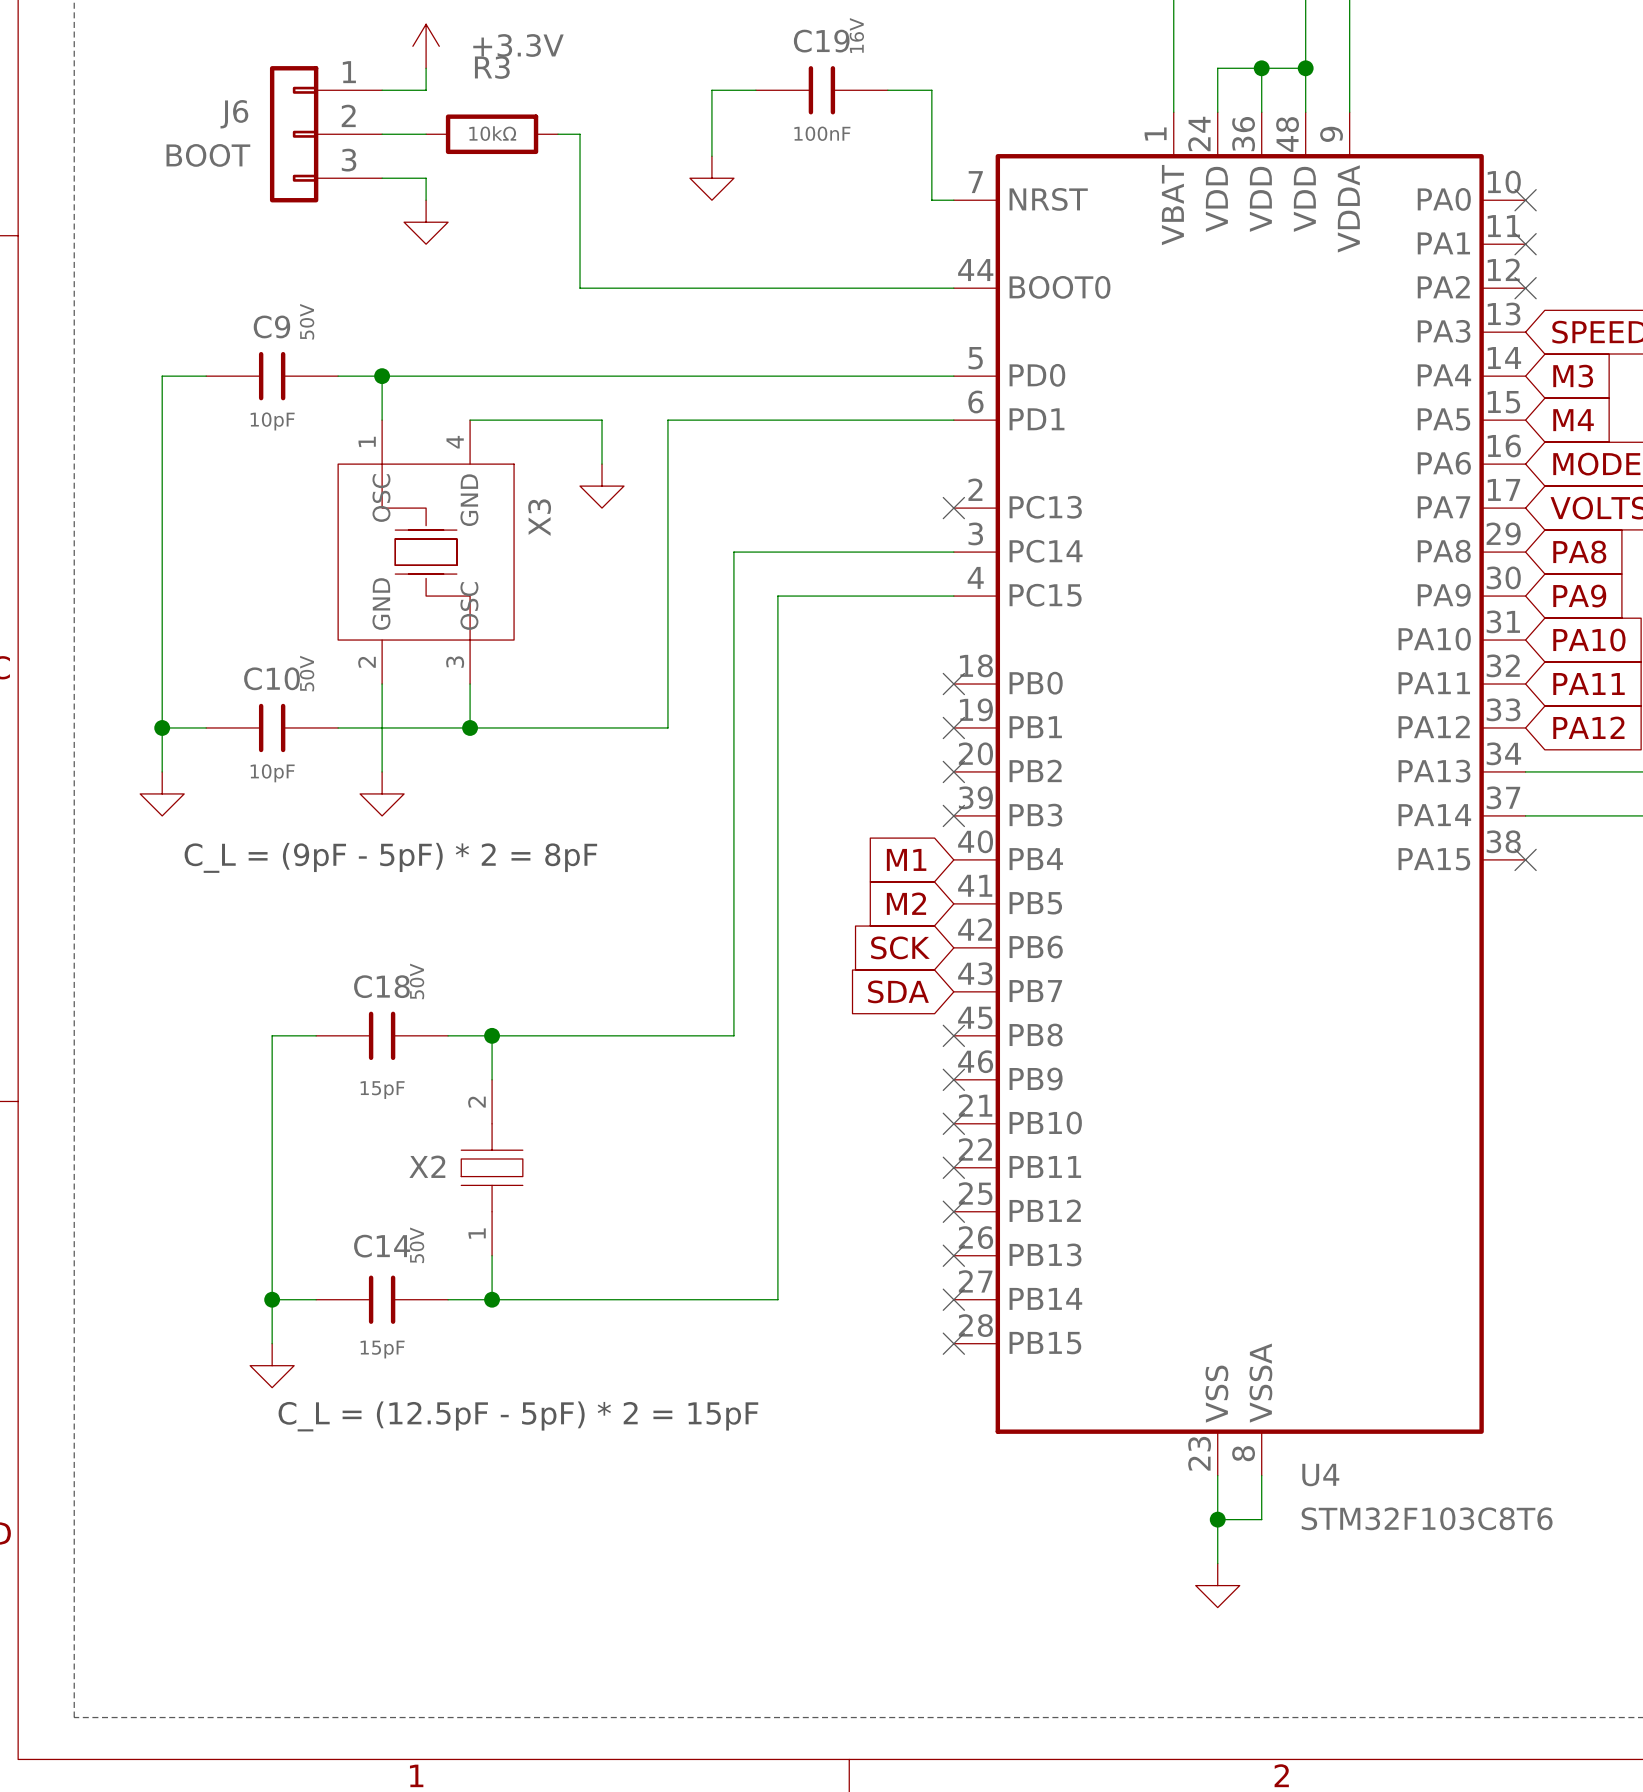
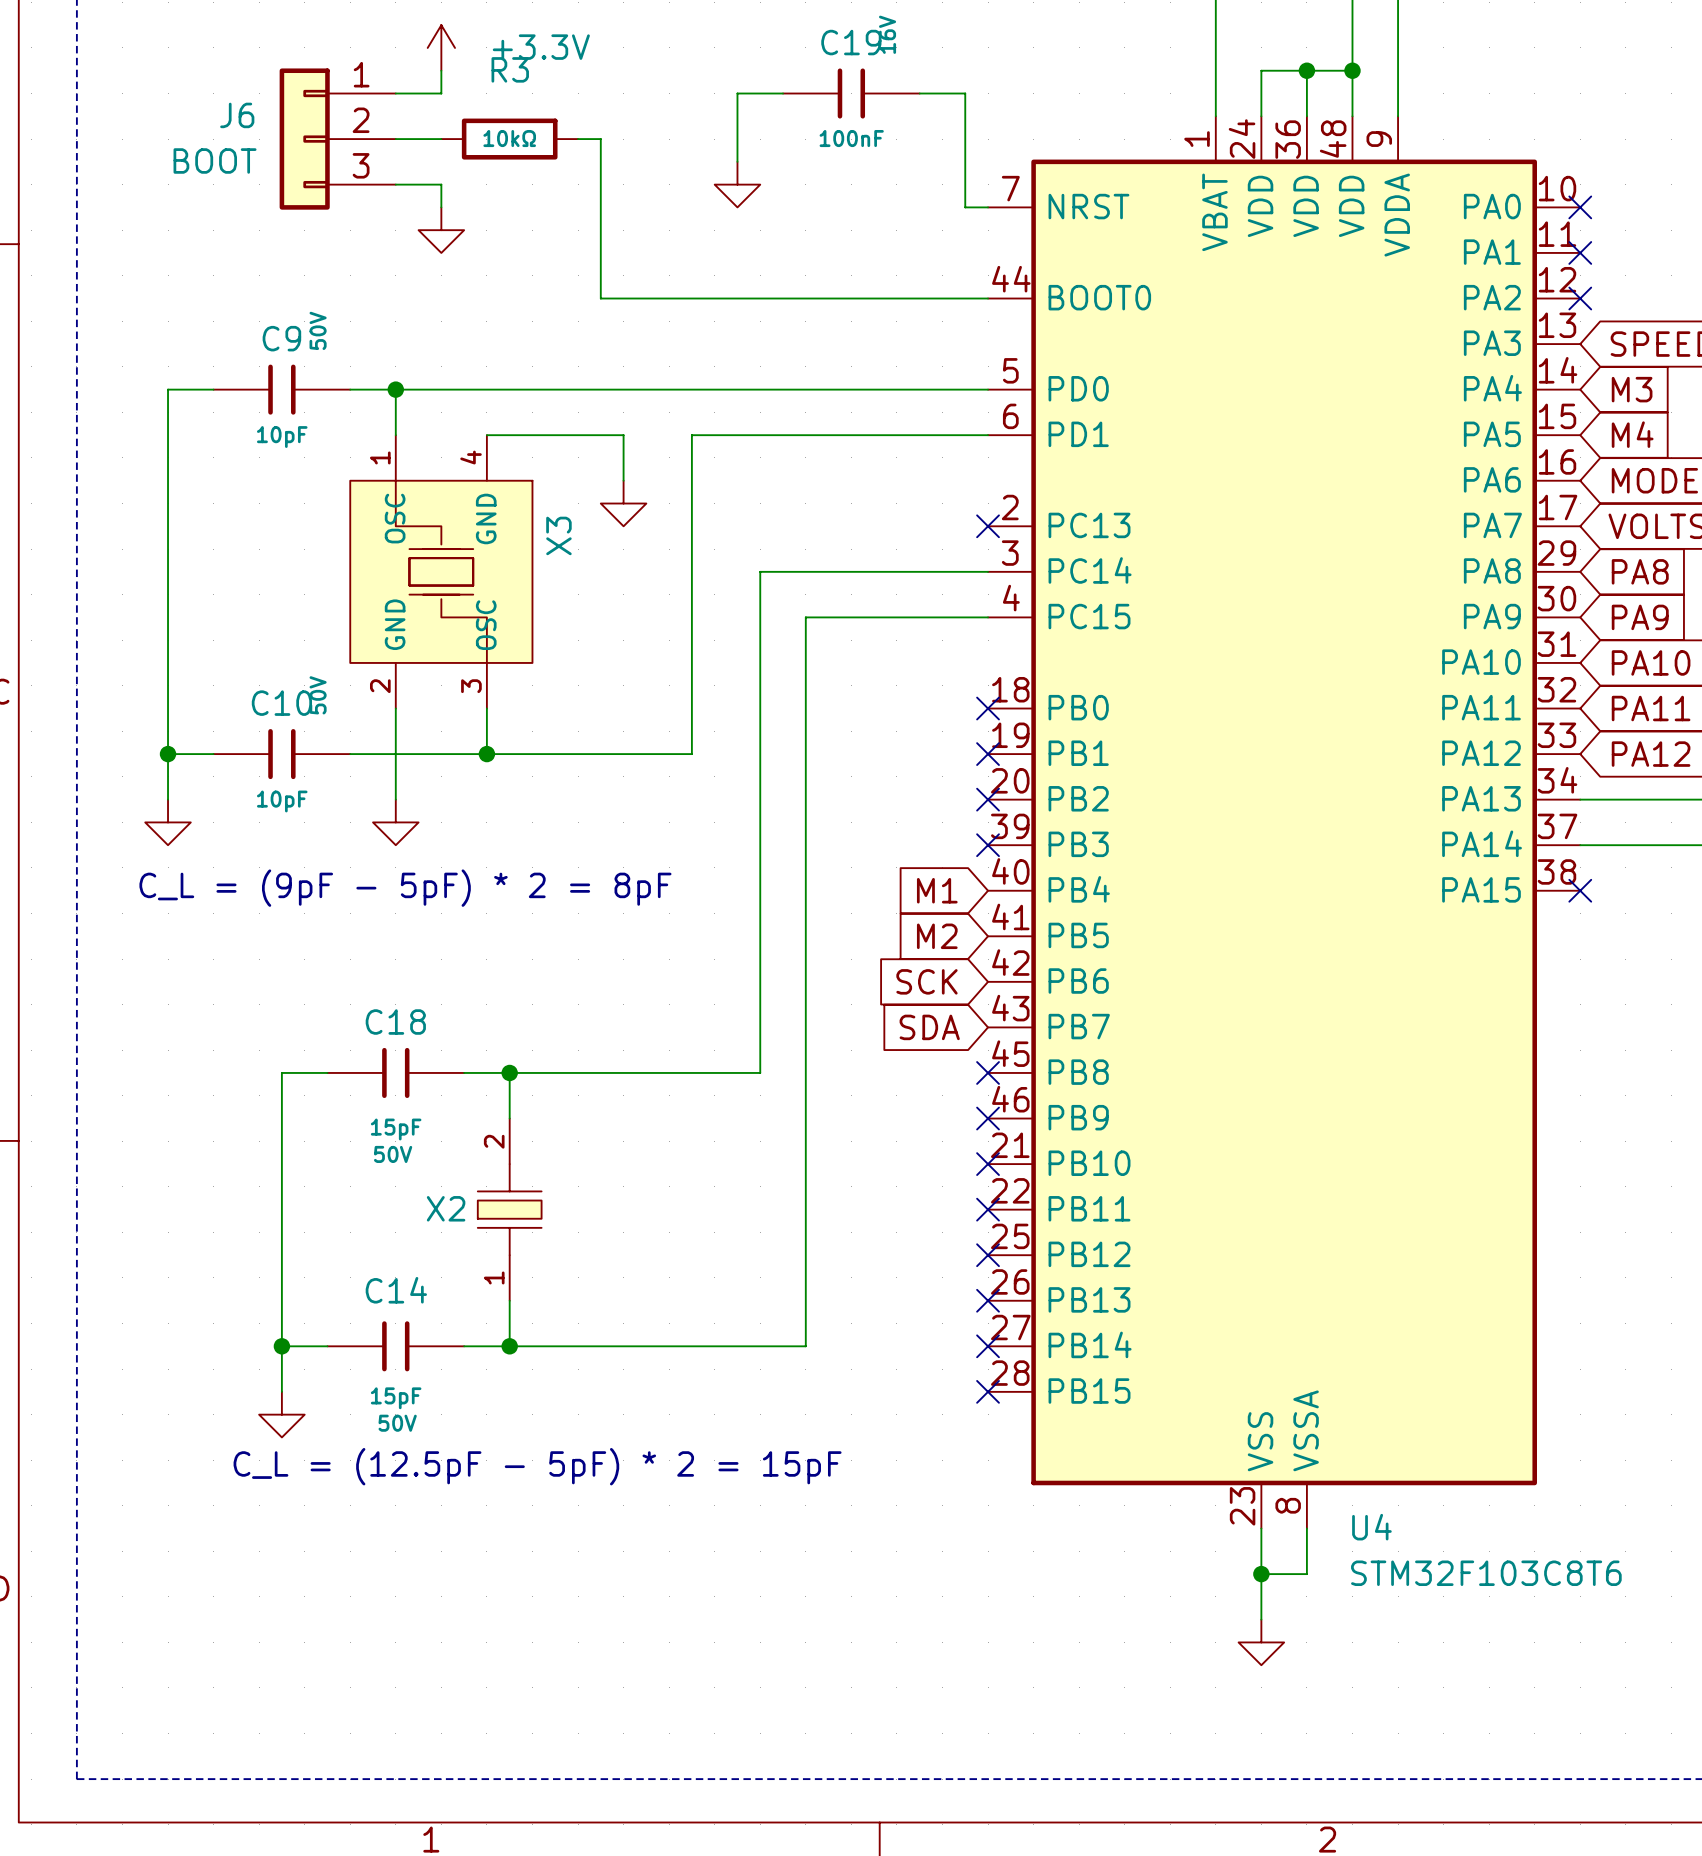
C18 text rotation: 0° (417, 981) -> 90° clockwise (393, 1154)
C18 text position: 50V (417, 981) -> 50V (393, 1154)
C14 text rotation: 0° (417, 1245) -> 90° clockwise (397, 1423)
C14 text position: 50V (417, 1245) -> 50V (397, 1423)

